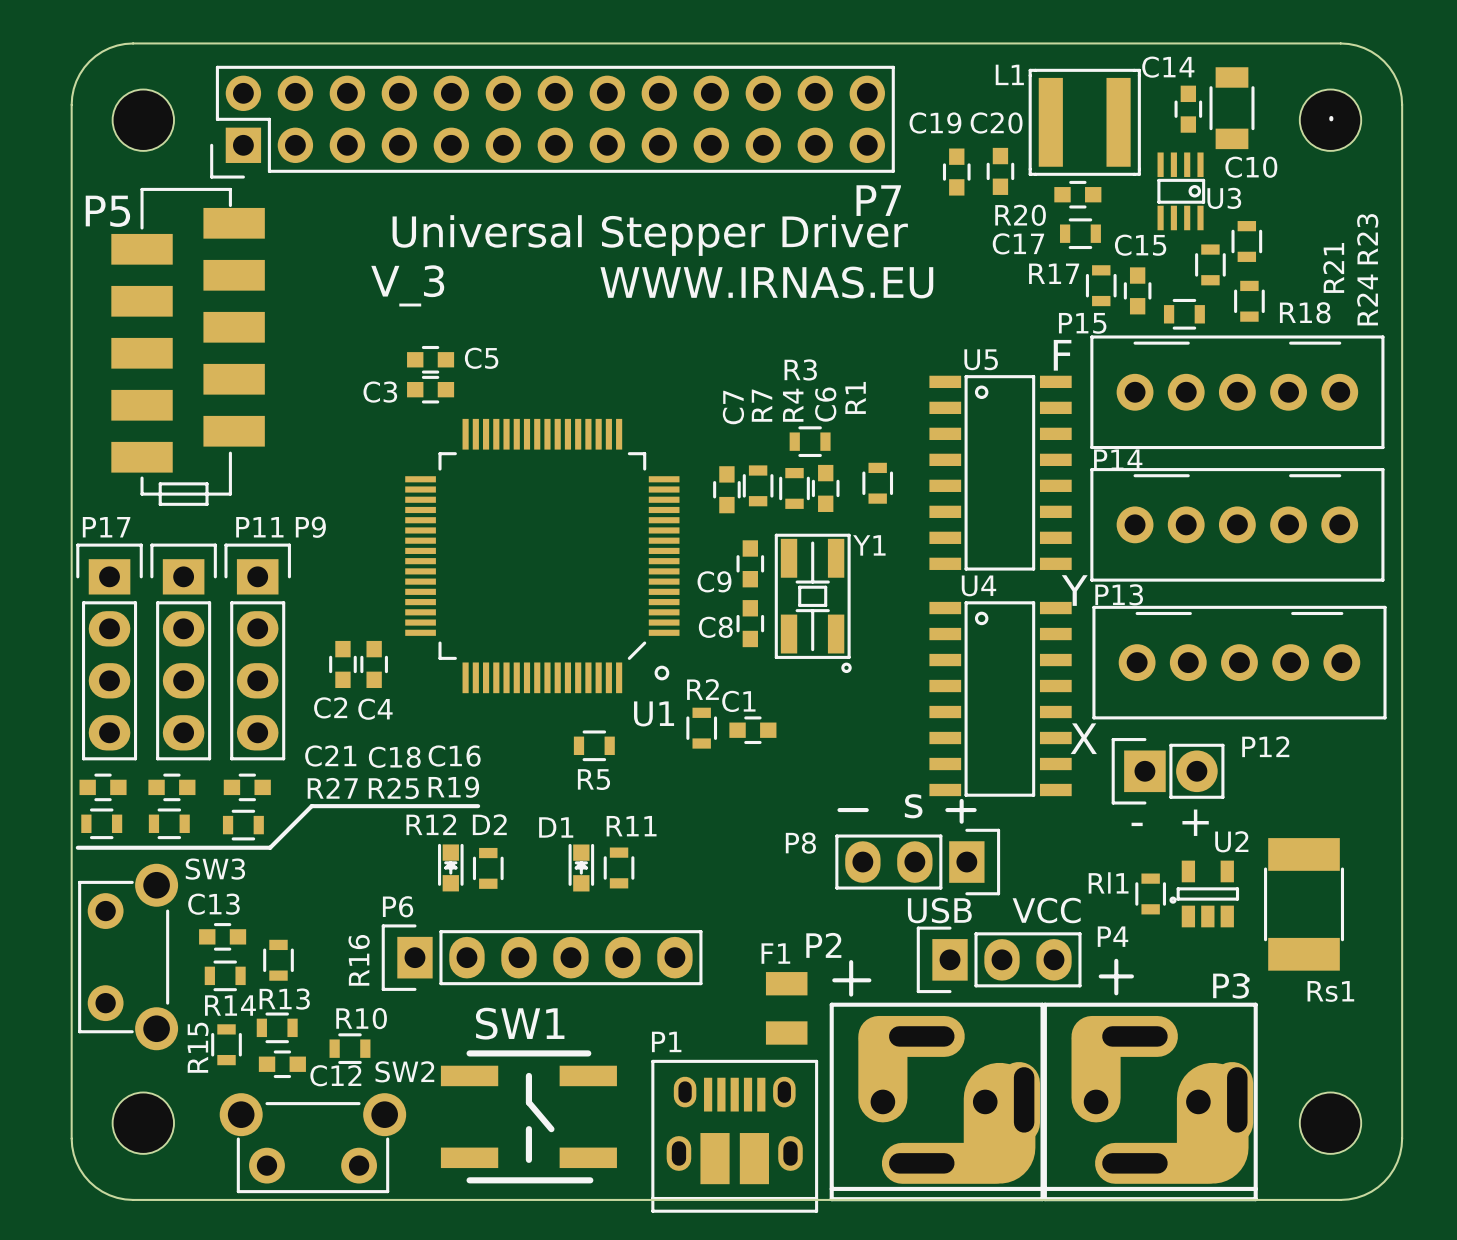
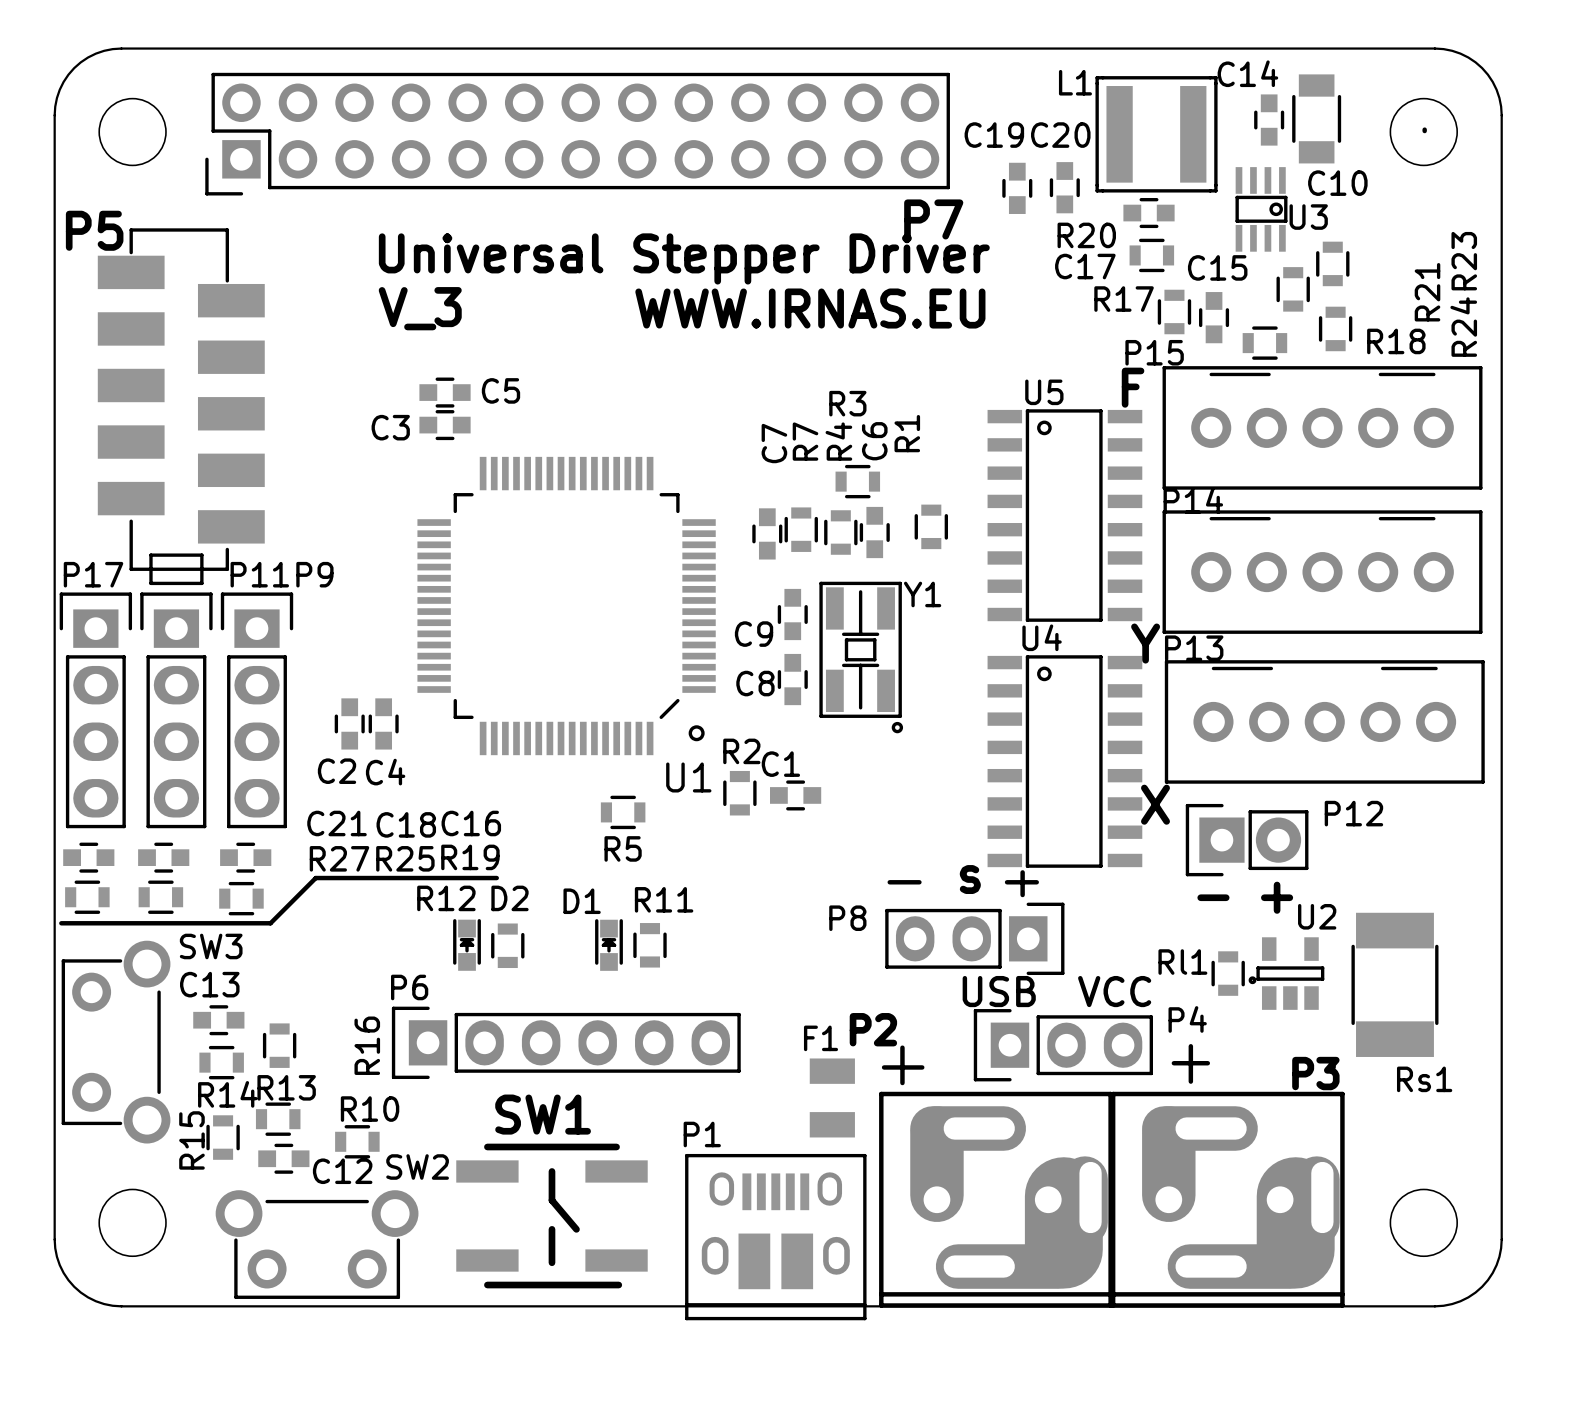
P5 footprint: [111, 187, 265, 506] -> [97, 228, 265, 586]

